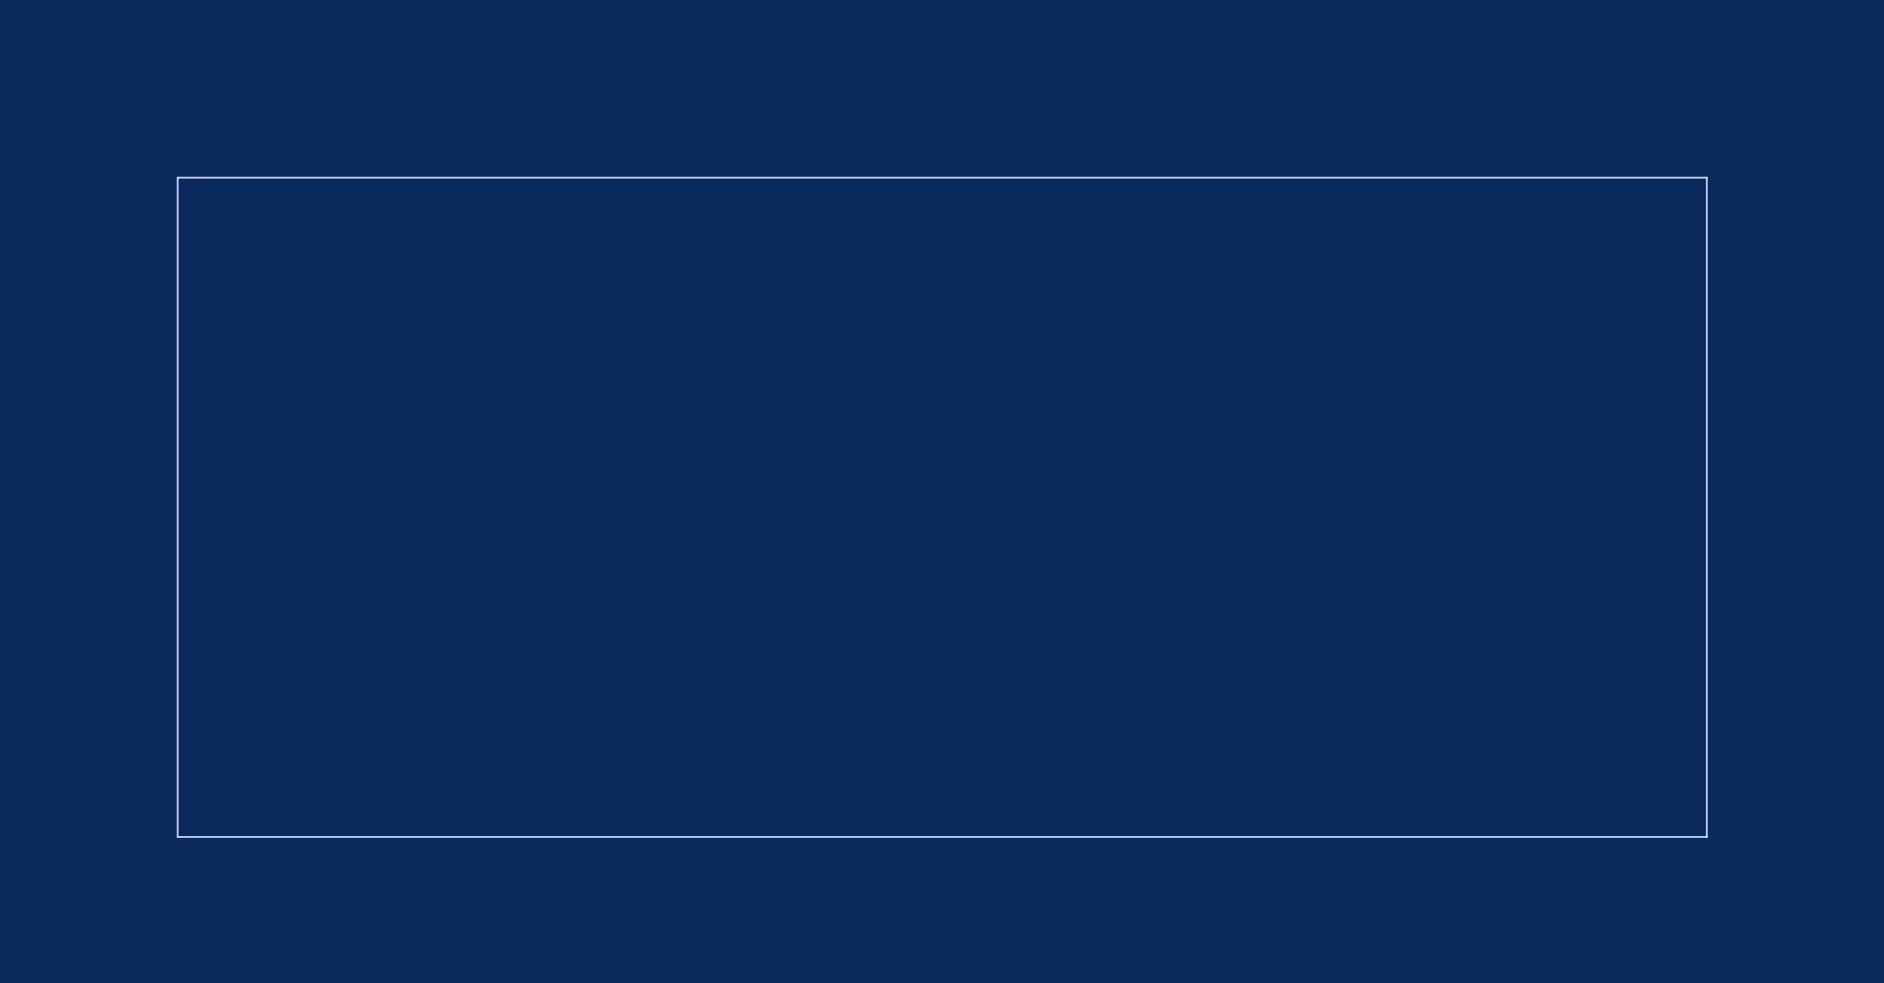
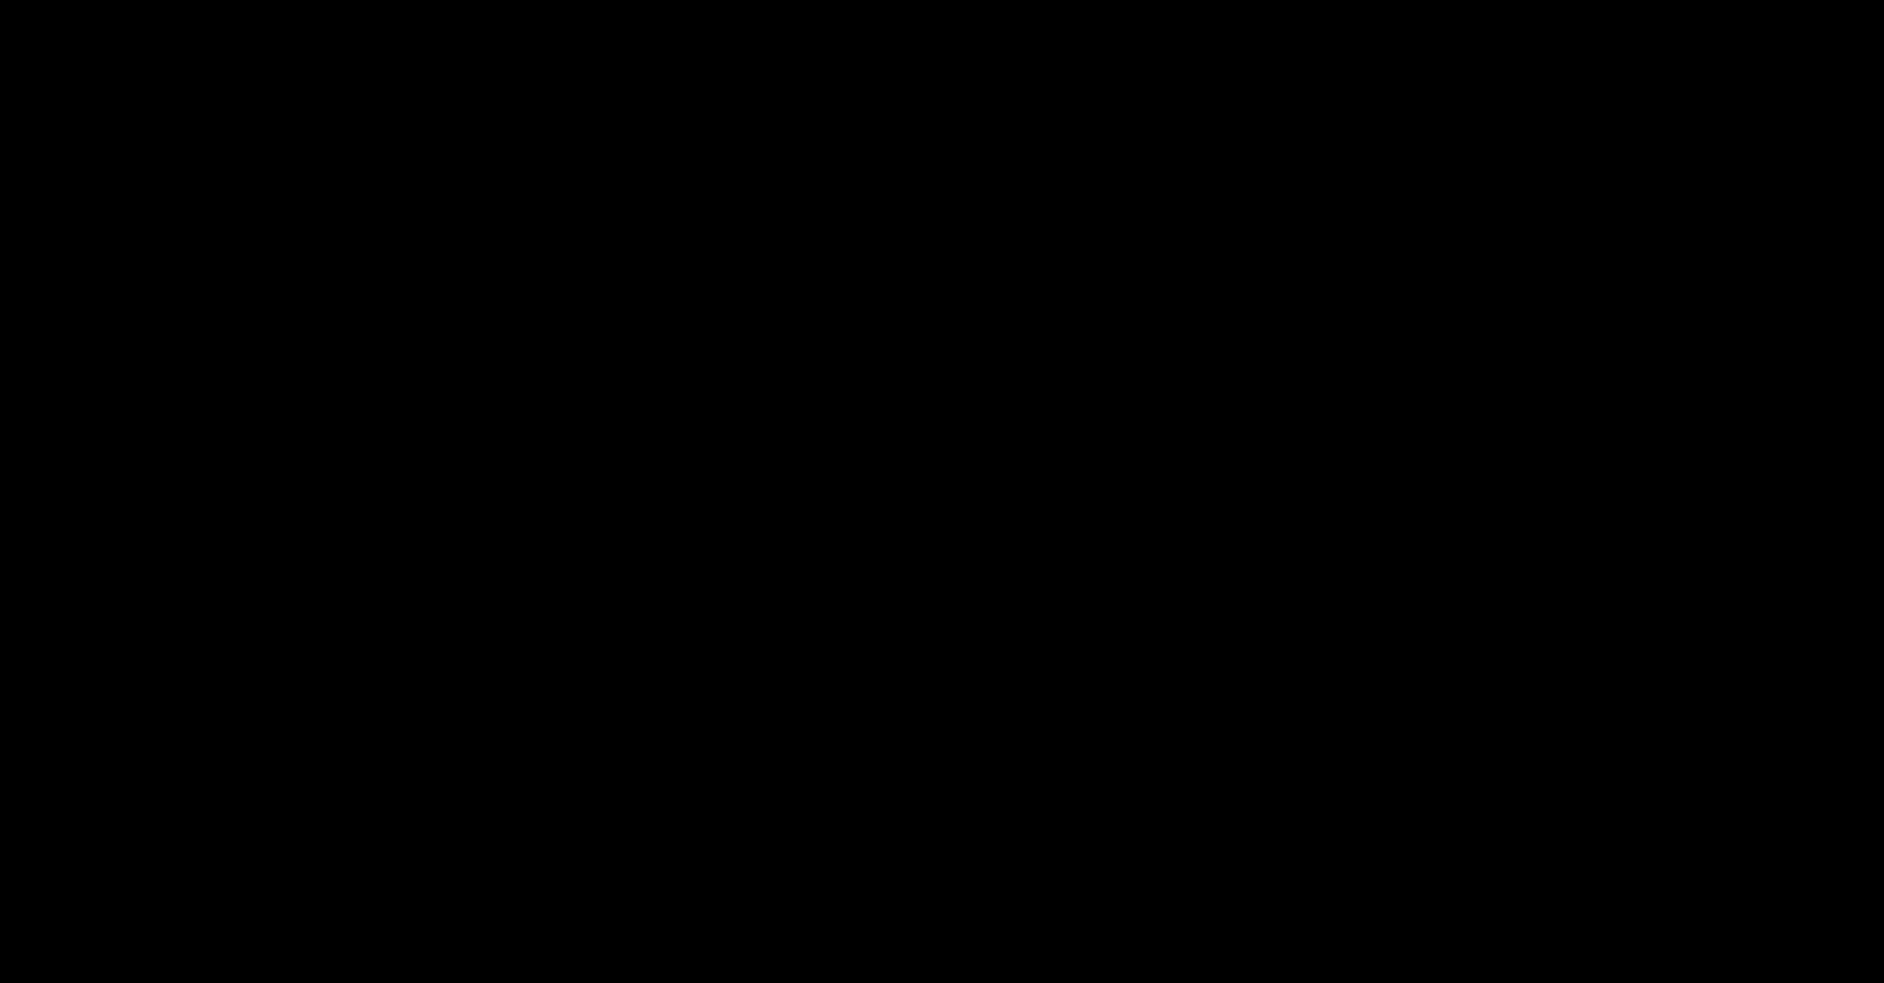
board edge: (177, 177) (1706, 177) (1706, 836) (177, 836) (177, 177) -> none

